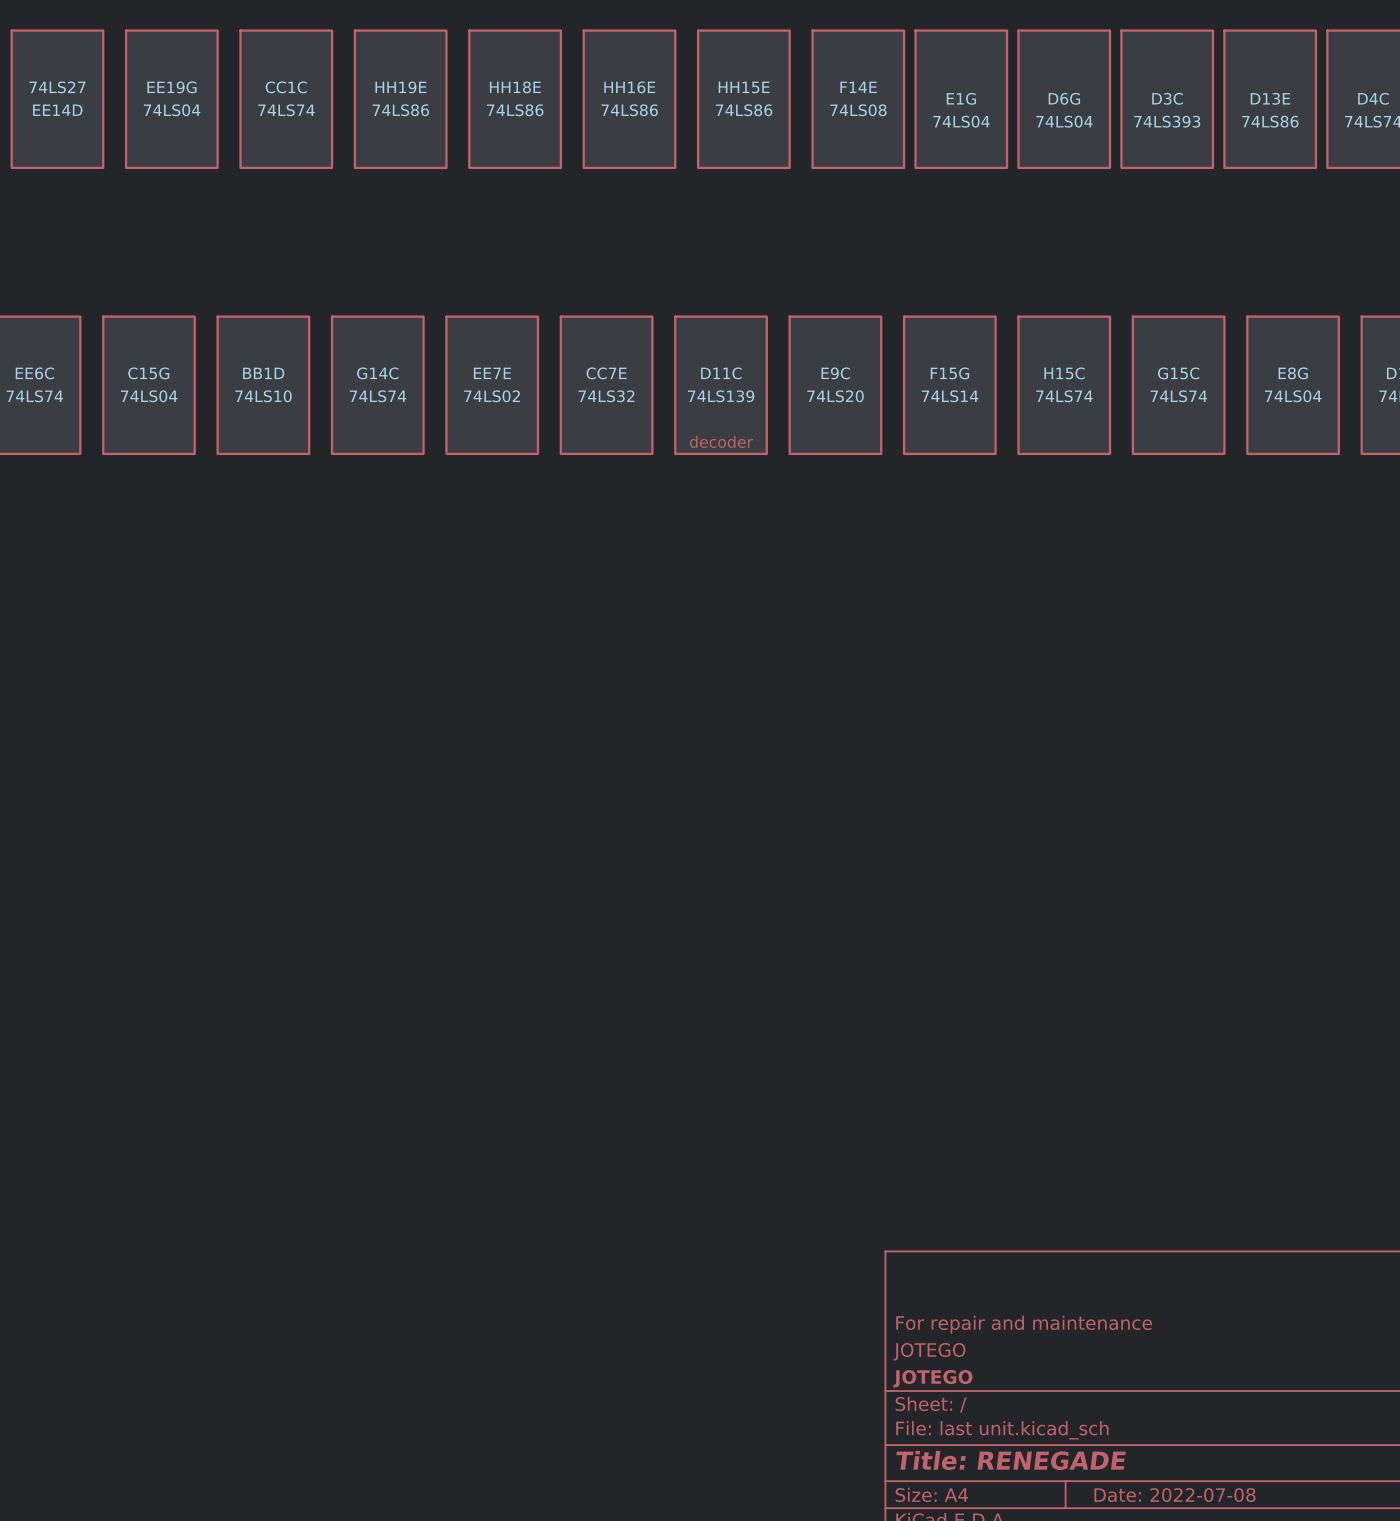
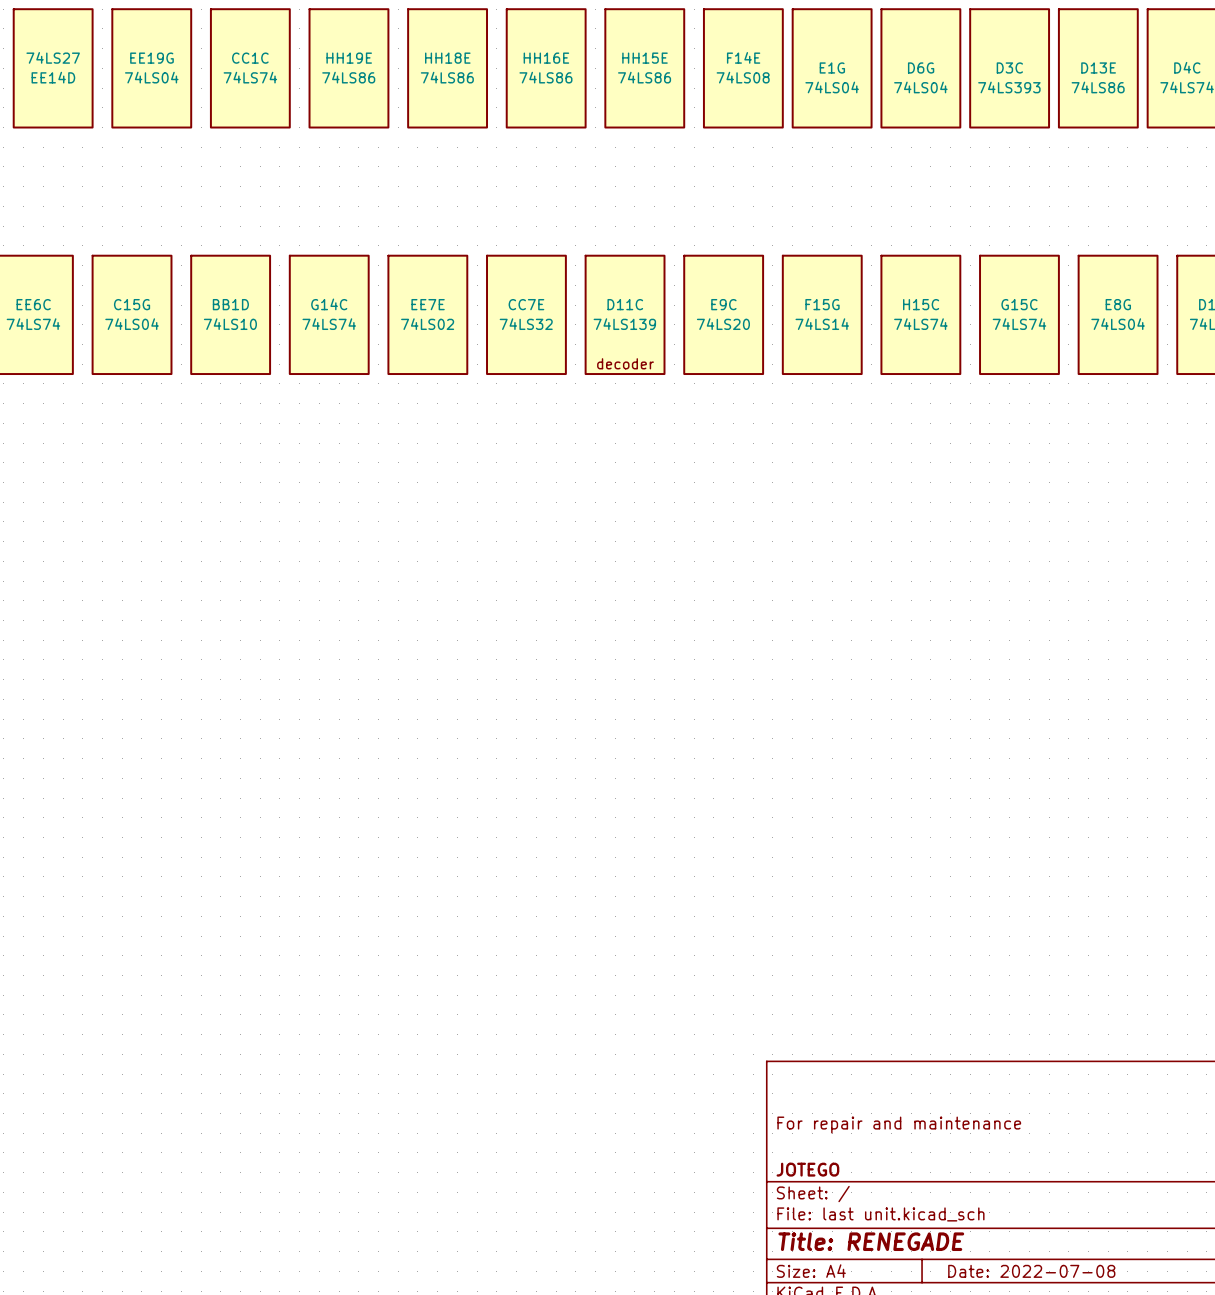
title block: JOTEGO (929, 1351) -> none

